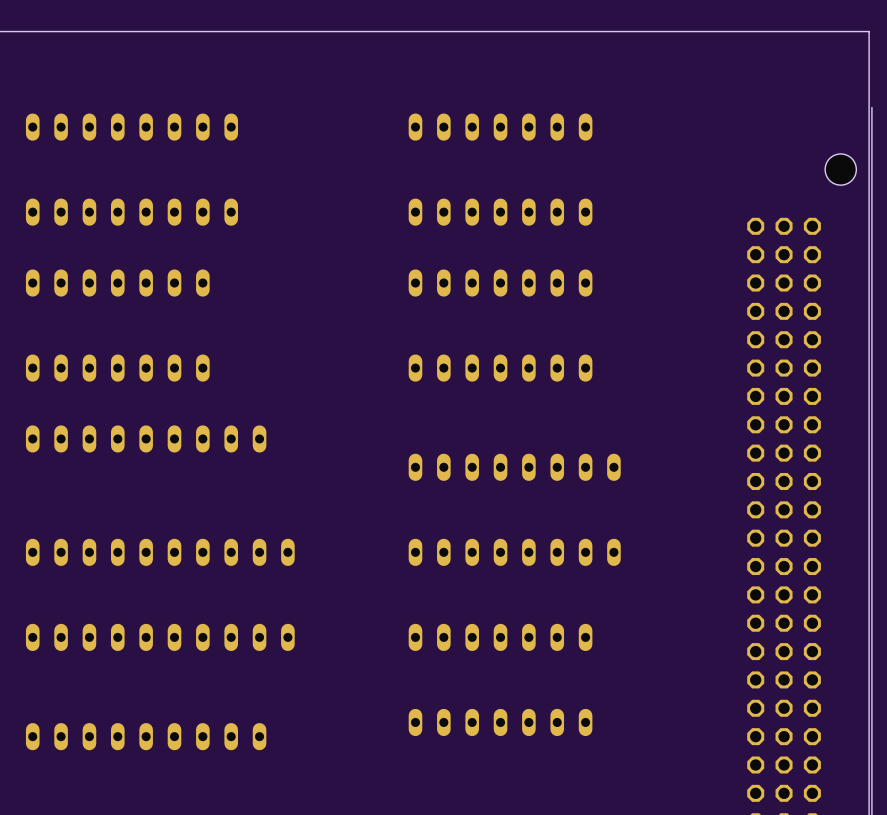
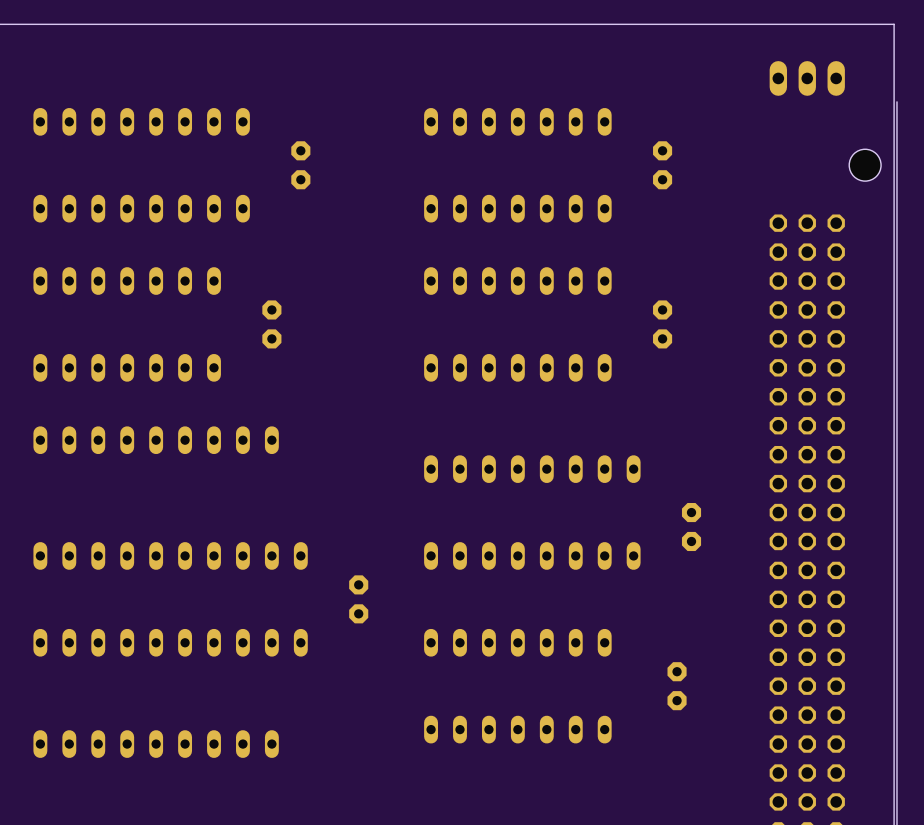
part: none -> (807, 78)
part: none -> (300, 165)
part: none -> (662, 165)
part: none -> (271, 324)
part: none -> (662, 324)
part: none -> (691, 527)
part: none -> (358, 599)
part: none -> (677, 686)

